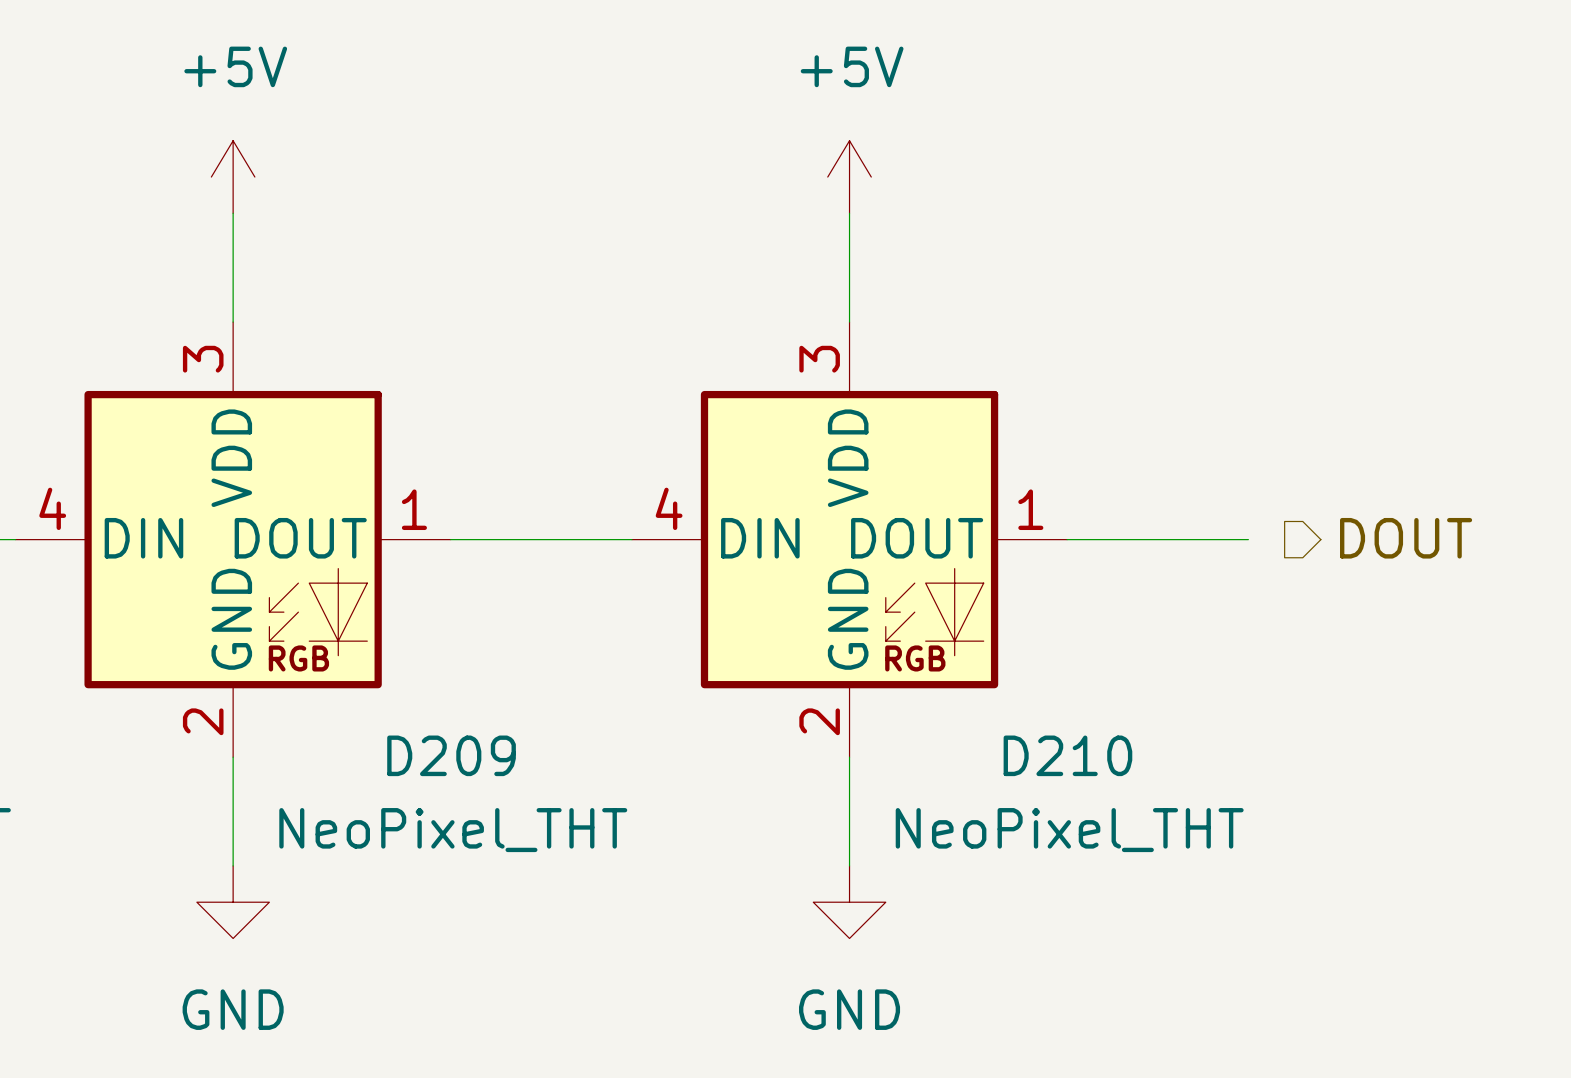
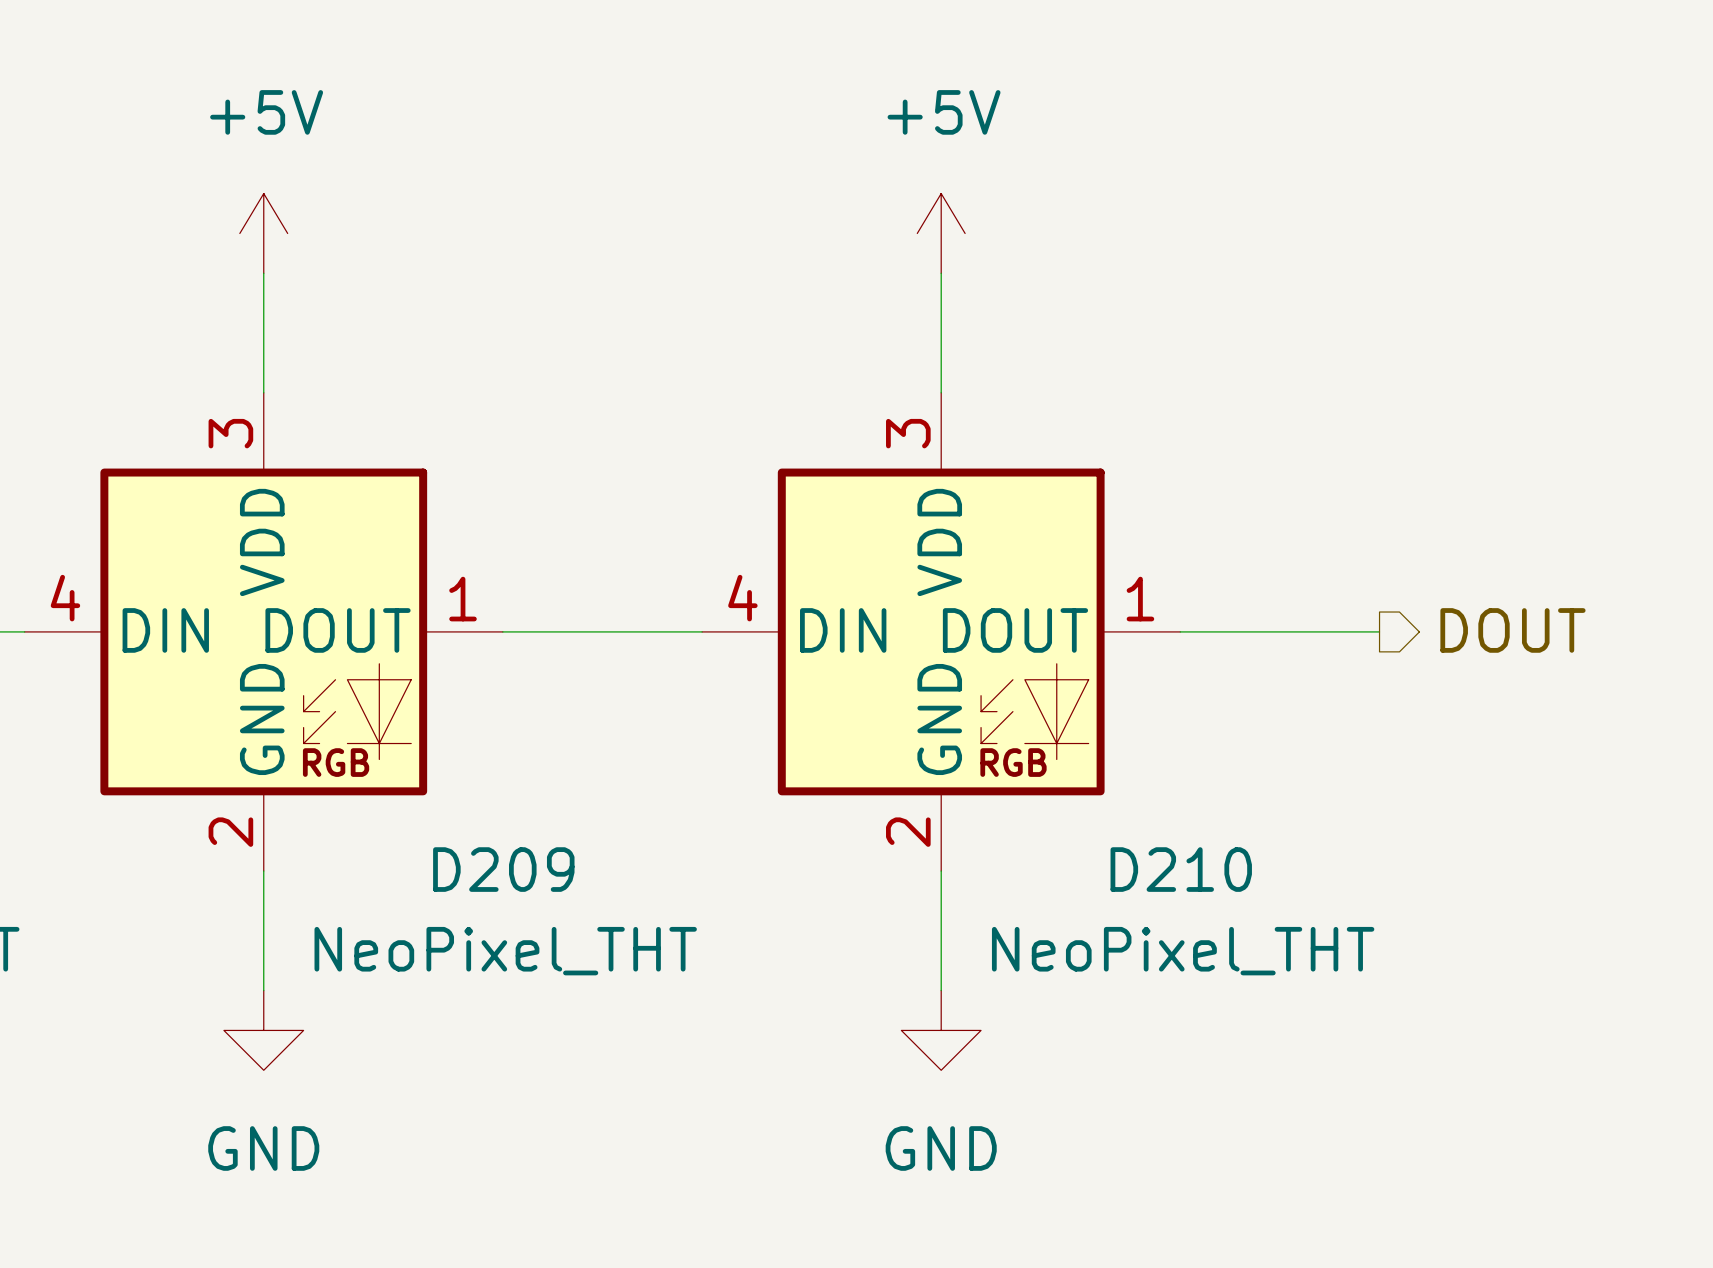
hierarchical label position: DOUT (1406, 538) -> DOUT (1512, 630)

